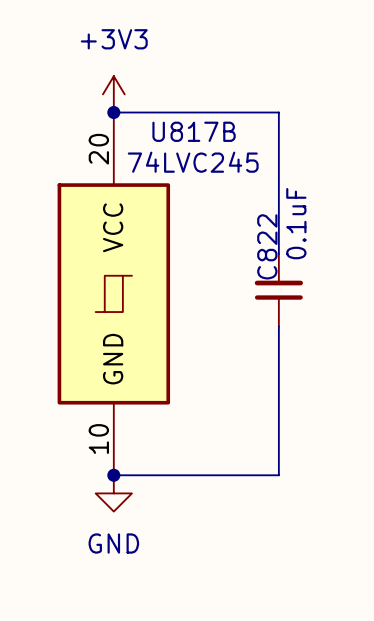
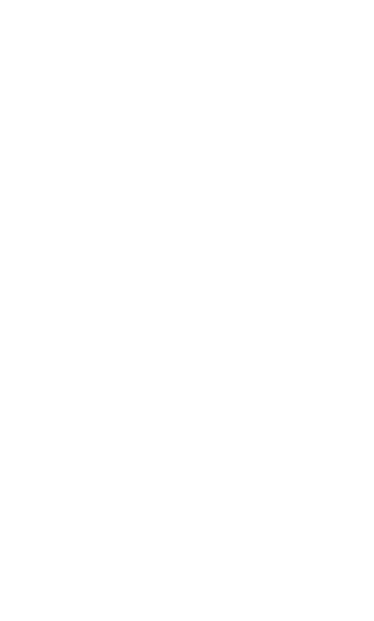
power symbol: +3V3 (113, 94) -> none
wire: (113, 112) (278, 112) (278, 253) -> none
junction: (113, 112) -> none
C822: 0.1uF (278, 290) -> none
U817B: 74LVC245 (113, 293) -> none
wire: (278, 326) (278, 475) (113, 475) -> none
junction: (113, 475) -> none
power symbol: GND (113, 493) -> none

